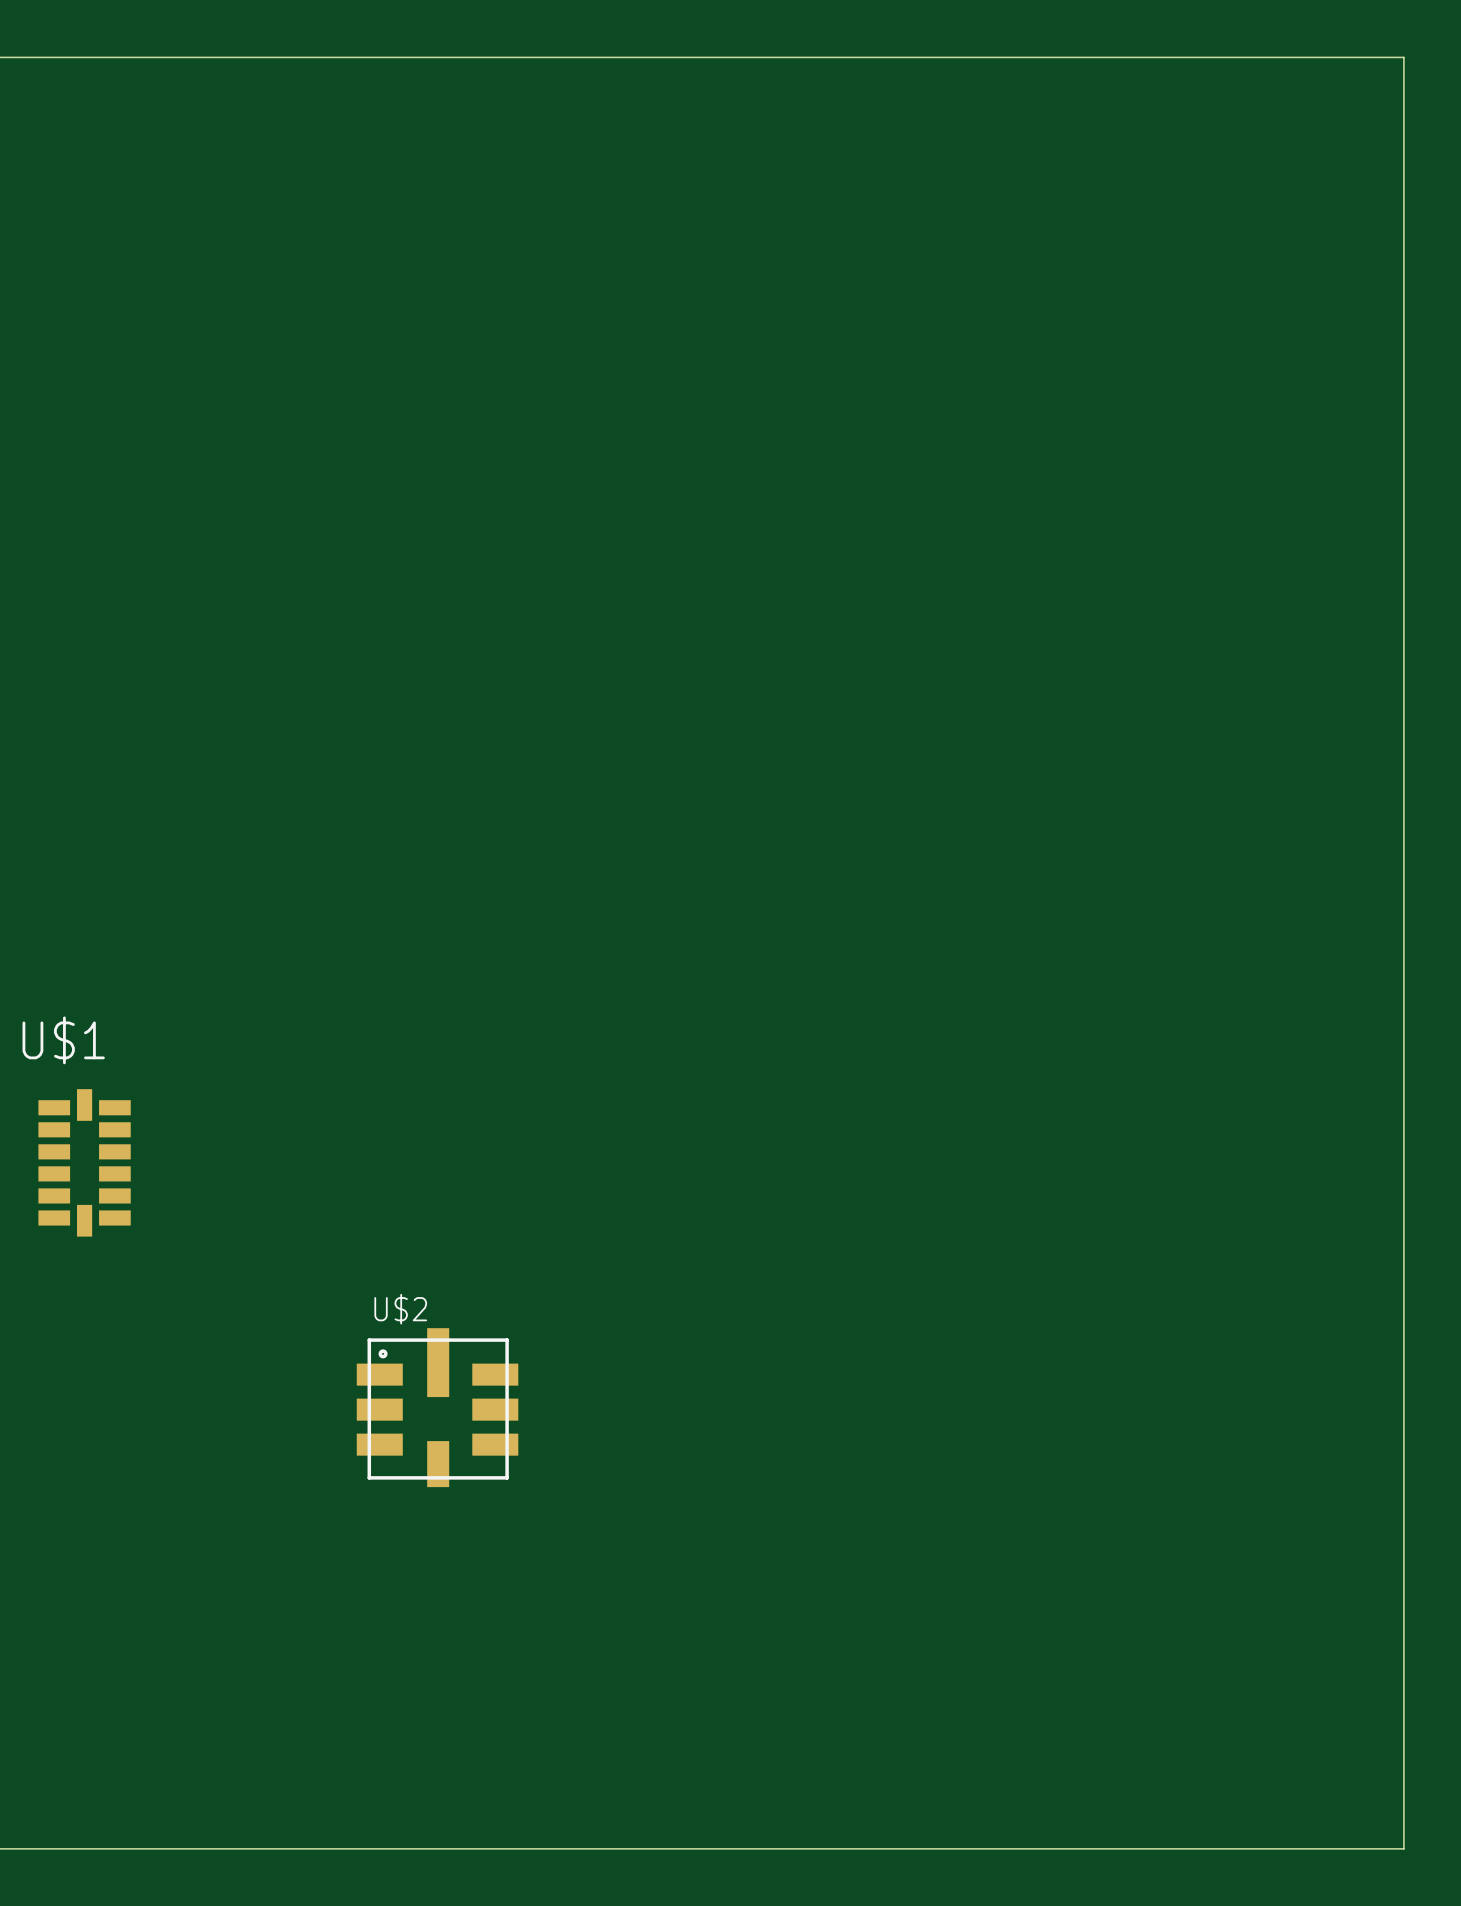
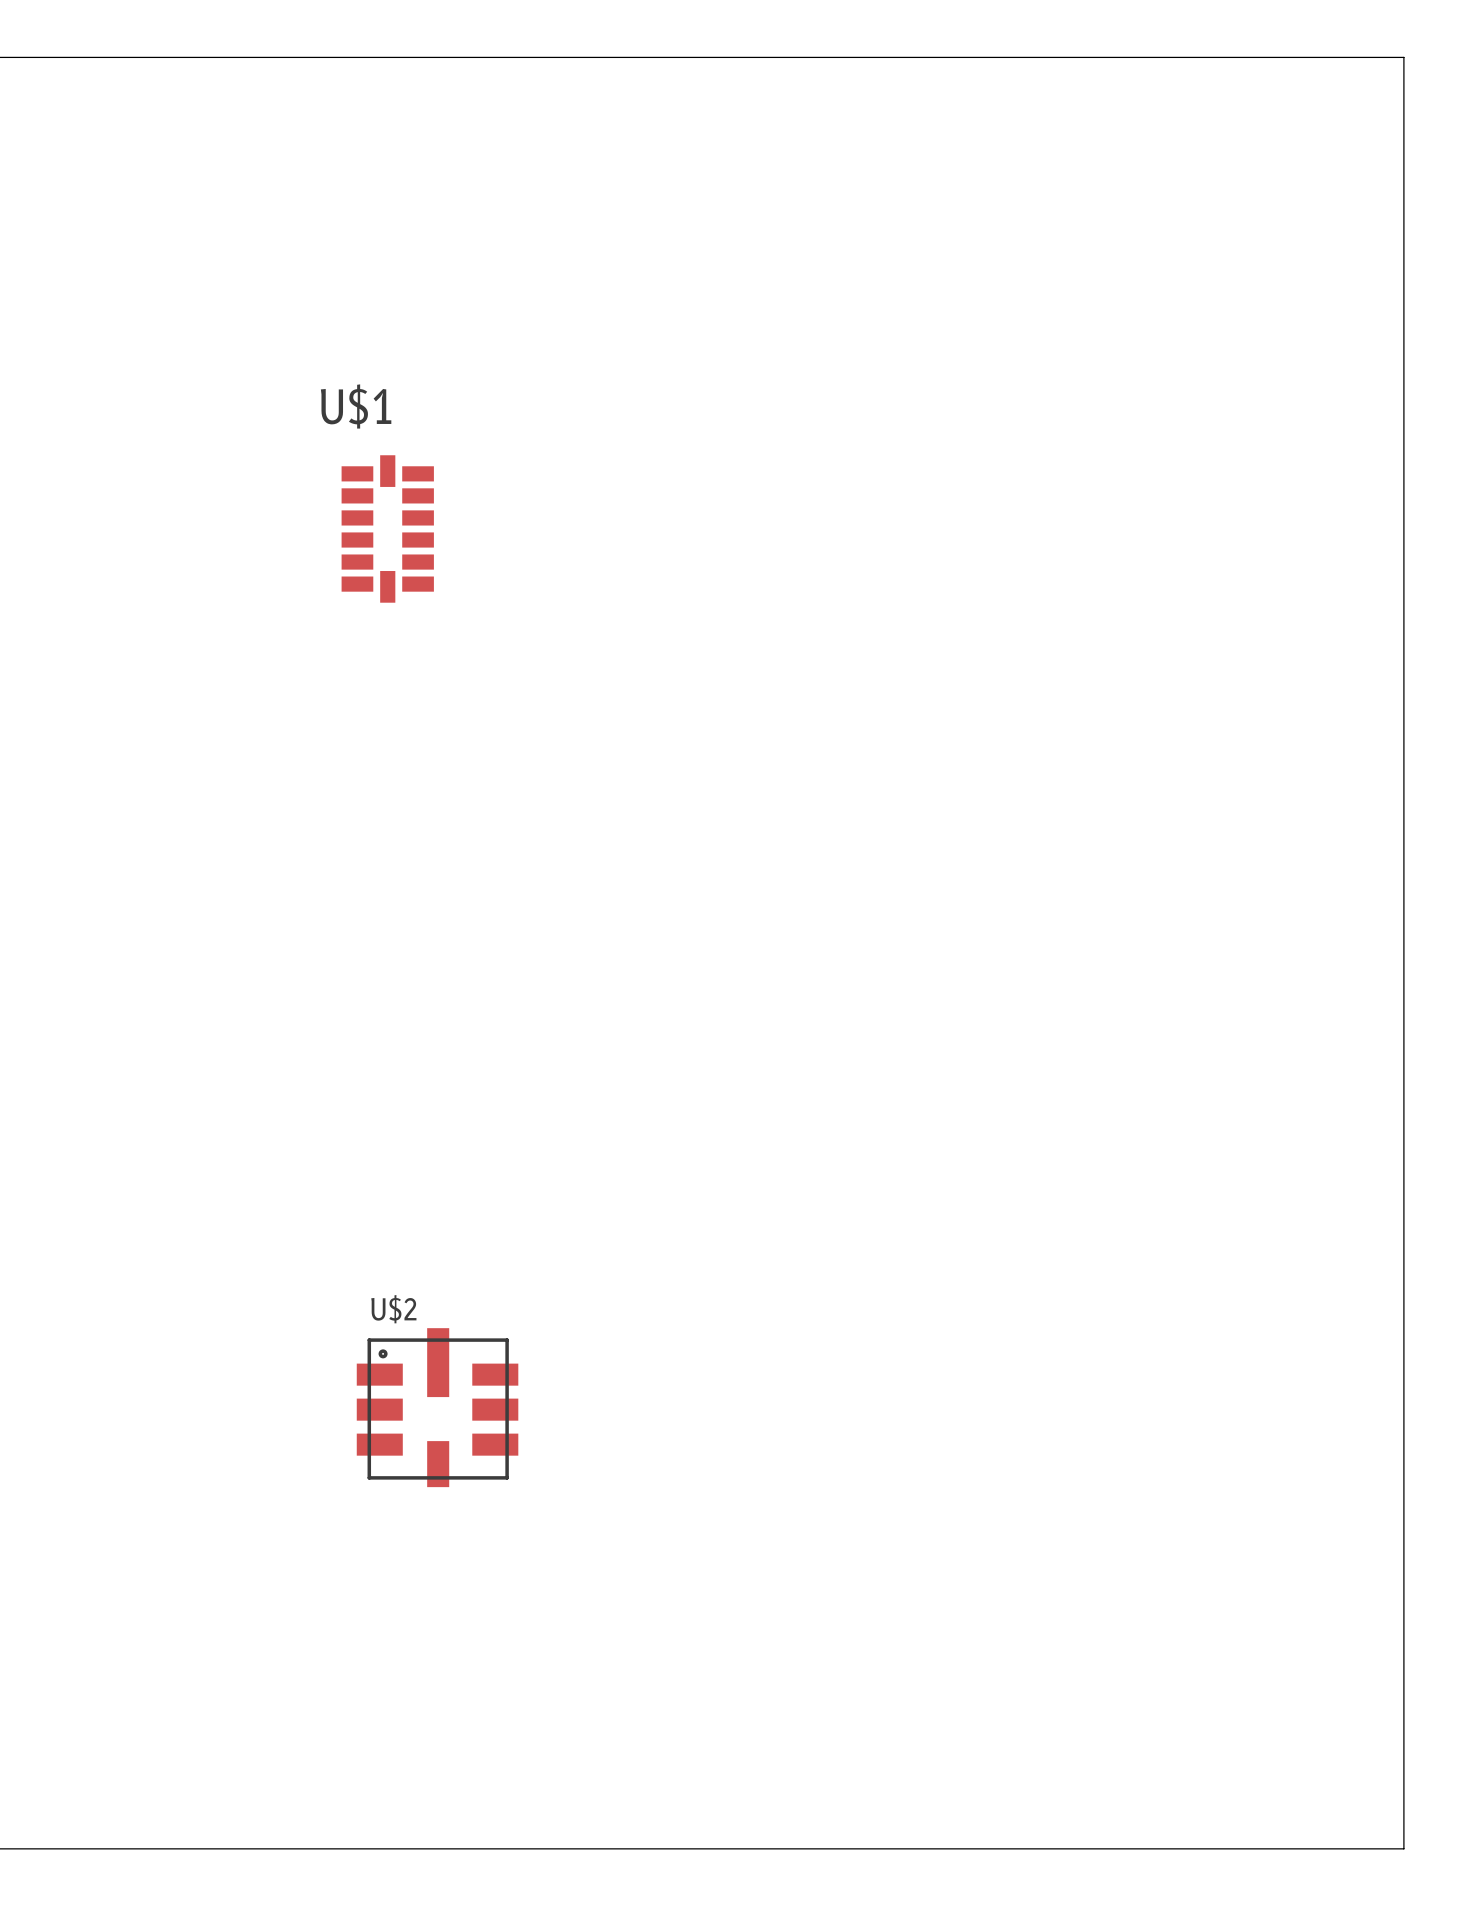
U$1 position: (84, 1162) -> (387, 528)

